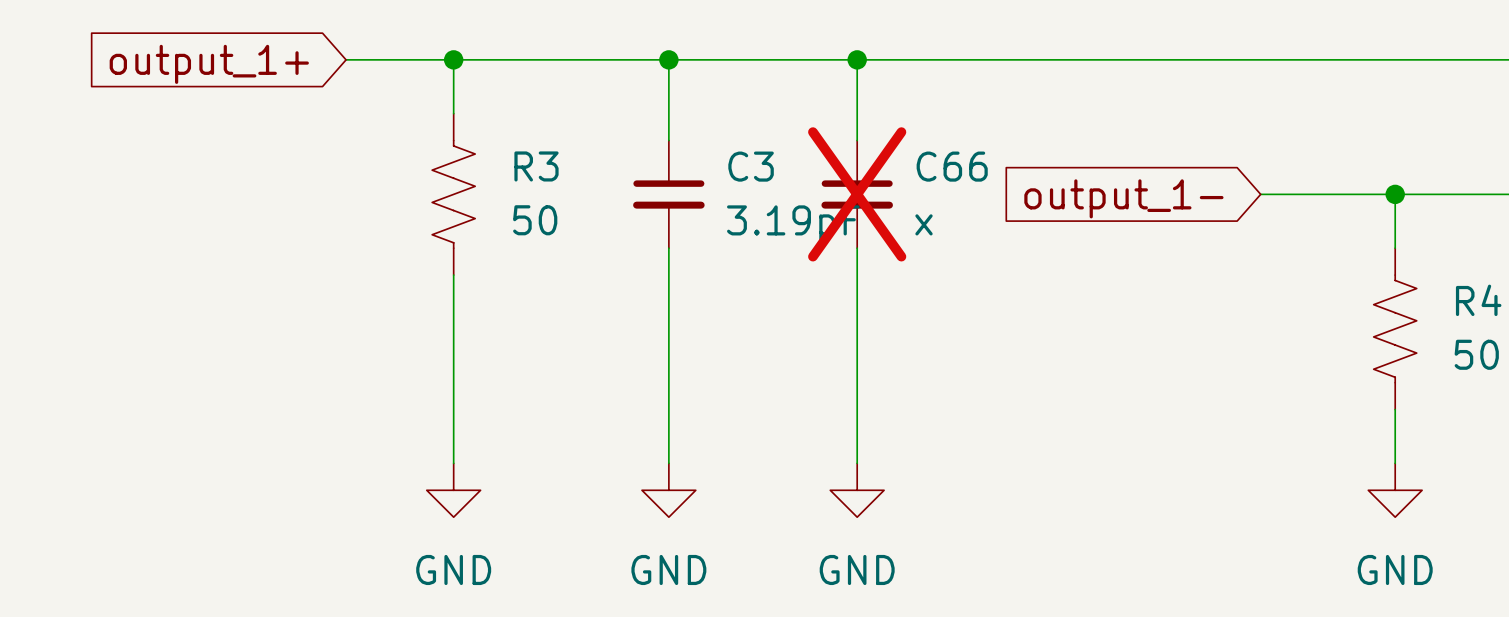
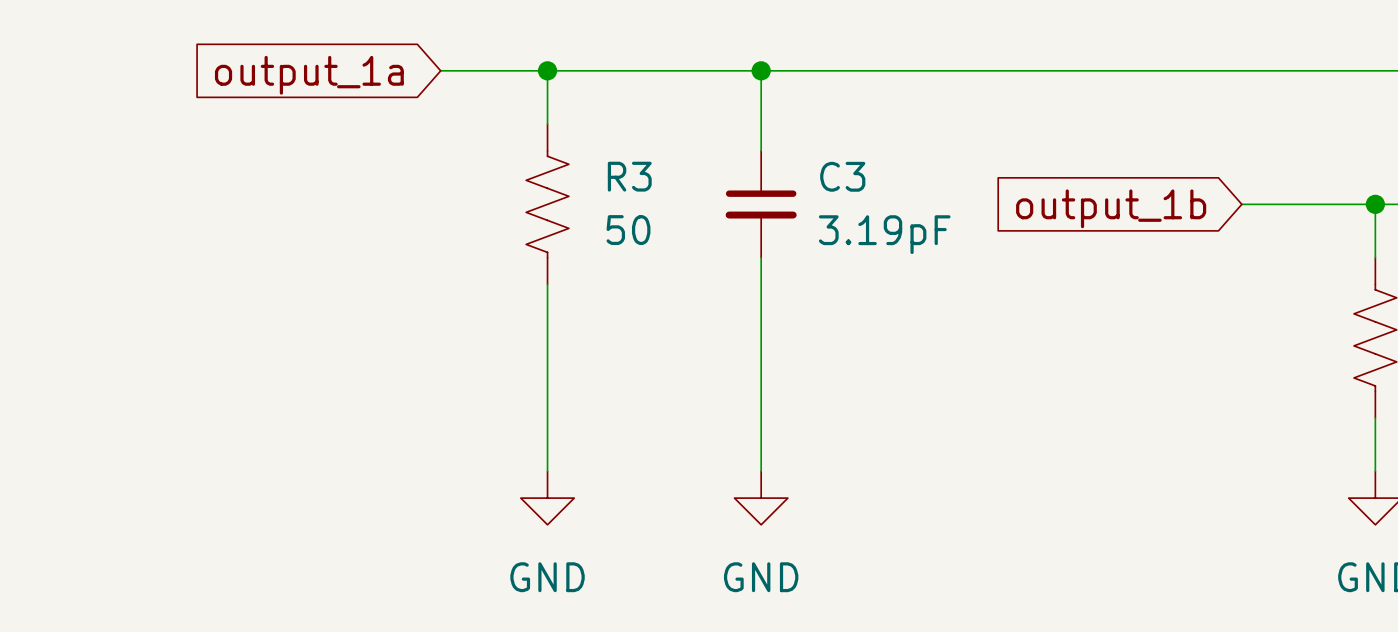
wire: (346, 59) (453, 59) (453, 113) -> none
junction: (453, 59) -> none
wire: none -> (547, 70) (547, 124)
junction: none -> (547, 70)
wire: (668, 59) (668, 140) -> (761, 70) (761, 150)
junction: (668, 59) -> none
junction: none -> (761, 70)
wire: (857, 59) (857, 140) -> none
junction: (857, 59) -> none
global label: output_1+ (209, 64) -> output_1a (309, 75)
R3 position: (453, 194) -> (547, 204)
C3 position: (668, 194) -> (761, 204)
C66: x (857, 194) -> none
global label: output_1- (1123, 198) -> output_1b (1111, 208)
wire: (668, 248) (668, 463) -> (761, 257) (761, 471)
wire: (857, 248) (857, 463) -> none
wire: (453, 275) (453, 463) -> (547, 284) (547, 471)
power symbol: GND (453, 490) -> none
power symbol: none -> GND (547, 498)
power symbol: GND (668, 490) -> none
power symbol: none -> GND (761, 498)
power symbol: GND (857, 490) -> none

